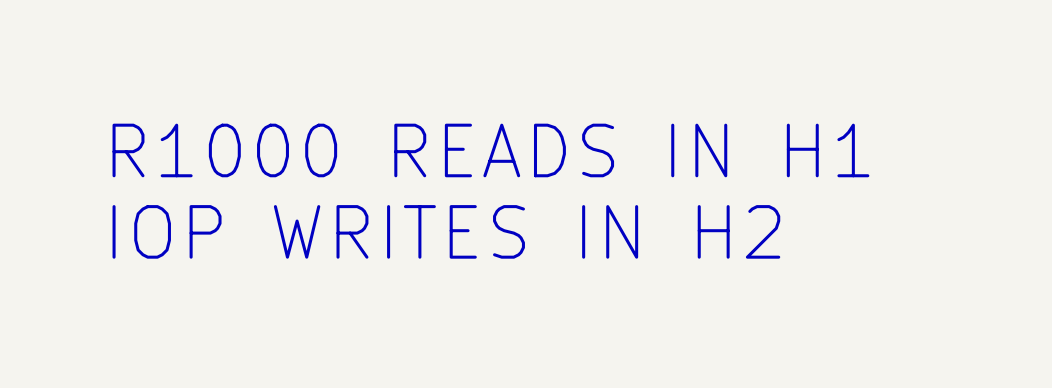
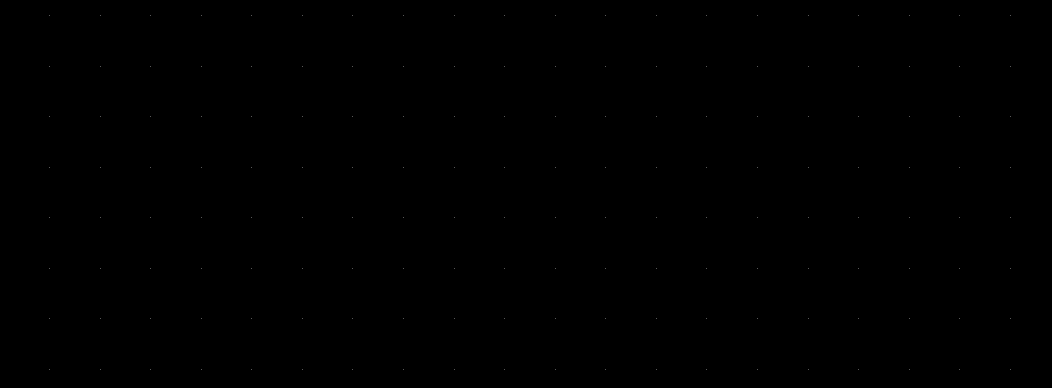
text: R1000 READS IN H1 (490, 150) -> none
text: IOP WRITES IN H2 (446, 231) -> none

